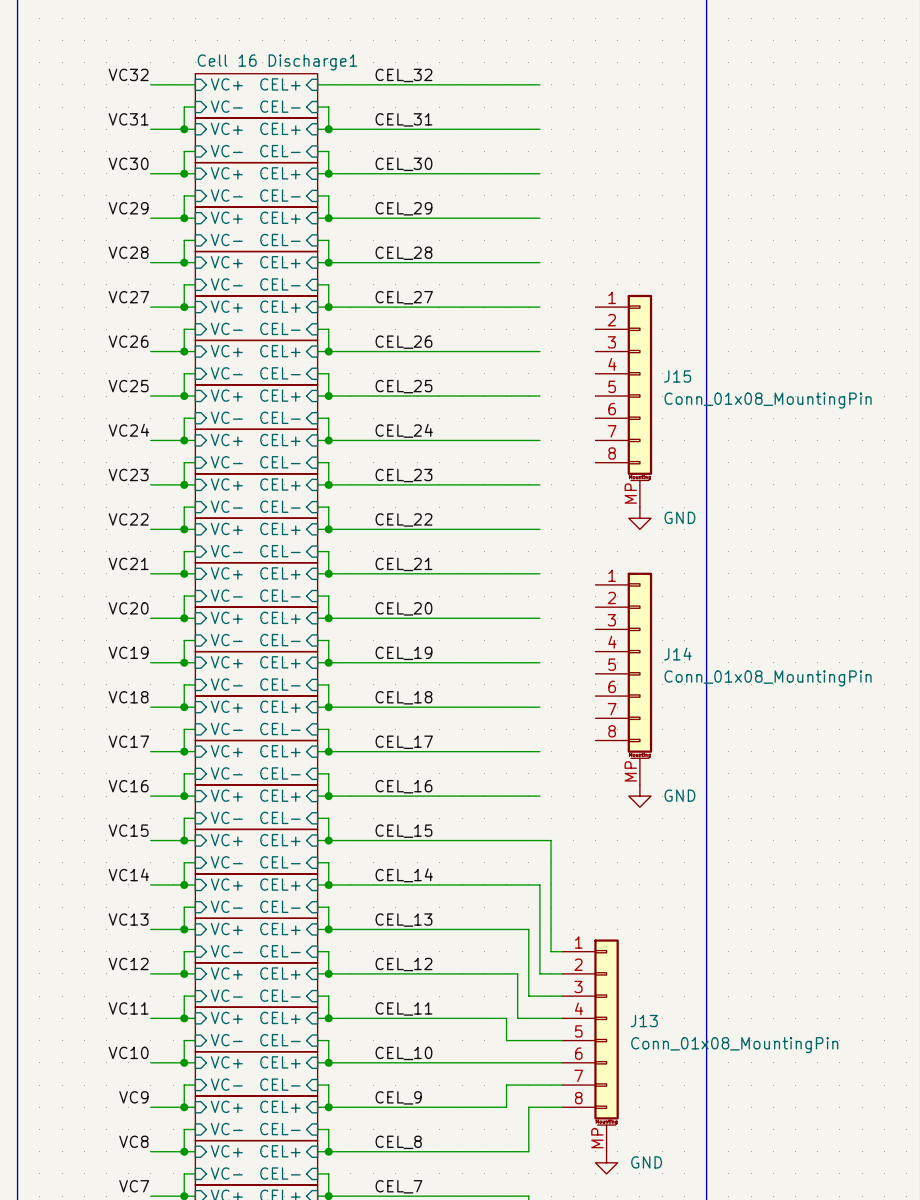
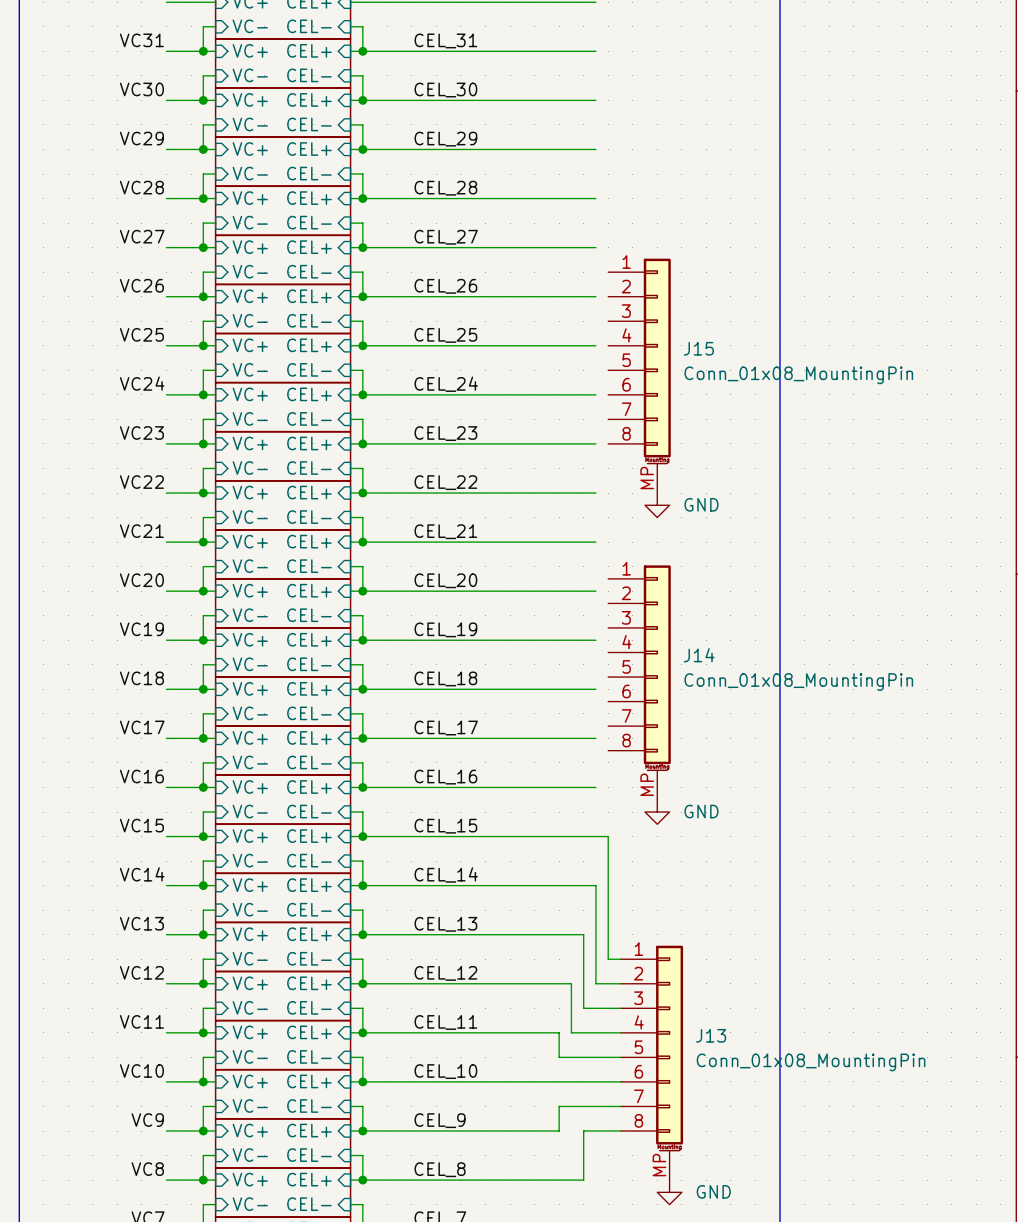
J15 position: (623, 401) -> (639, 375)
power symbol position: GND (639, 518) -> GND (657, 505)
J14 position: (623, 678) -> (639, 682)
power symbol position: GND (639, 796) -> GND (657, 812)

